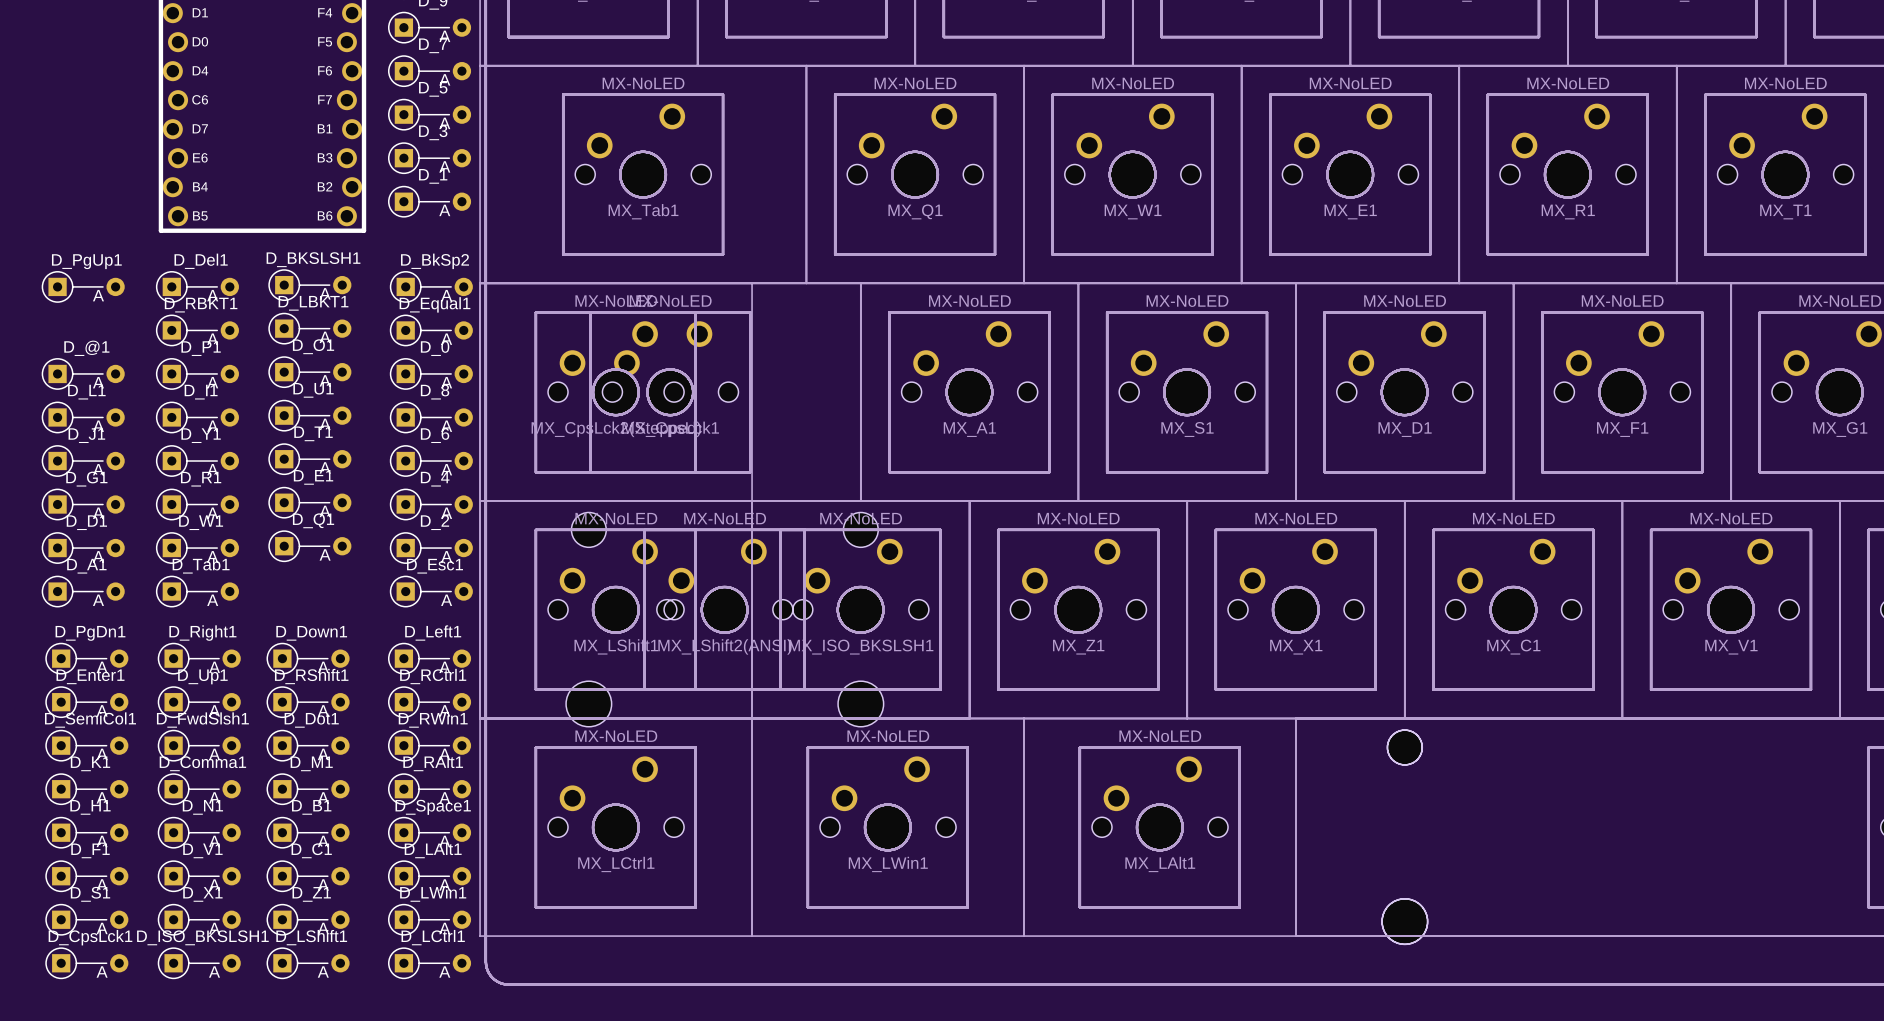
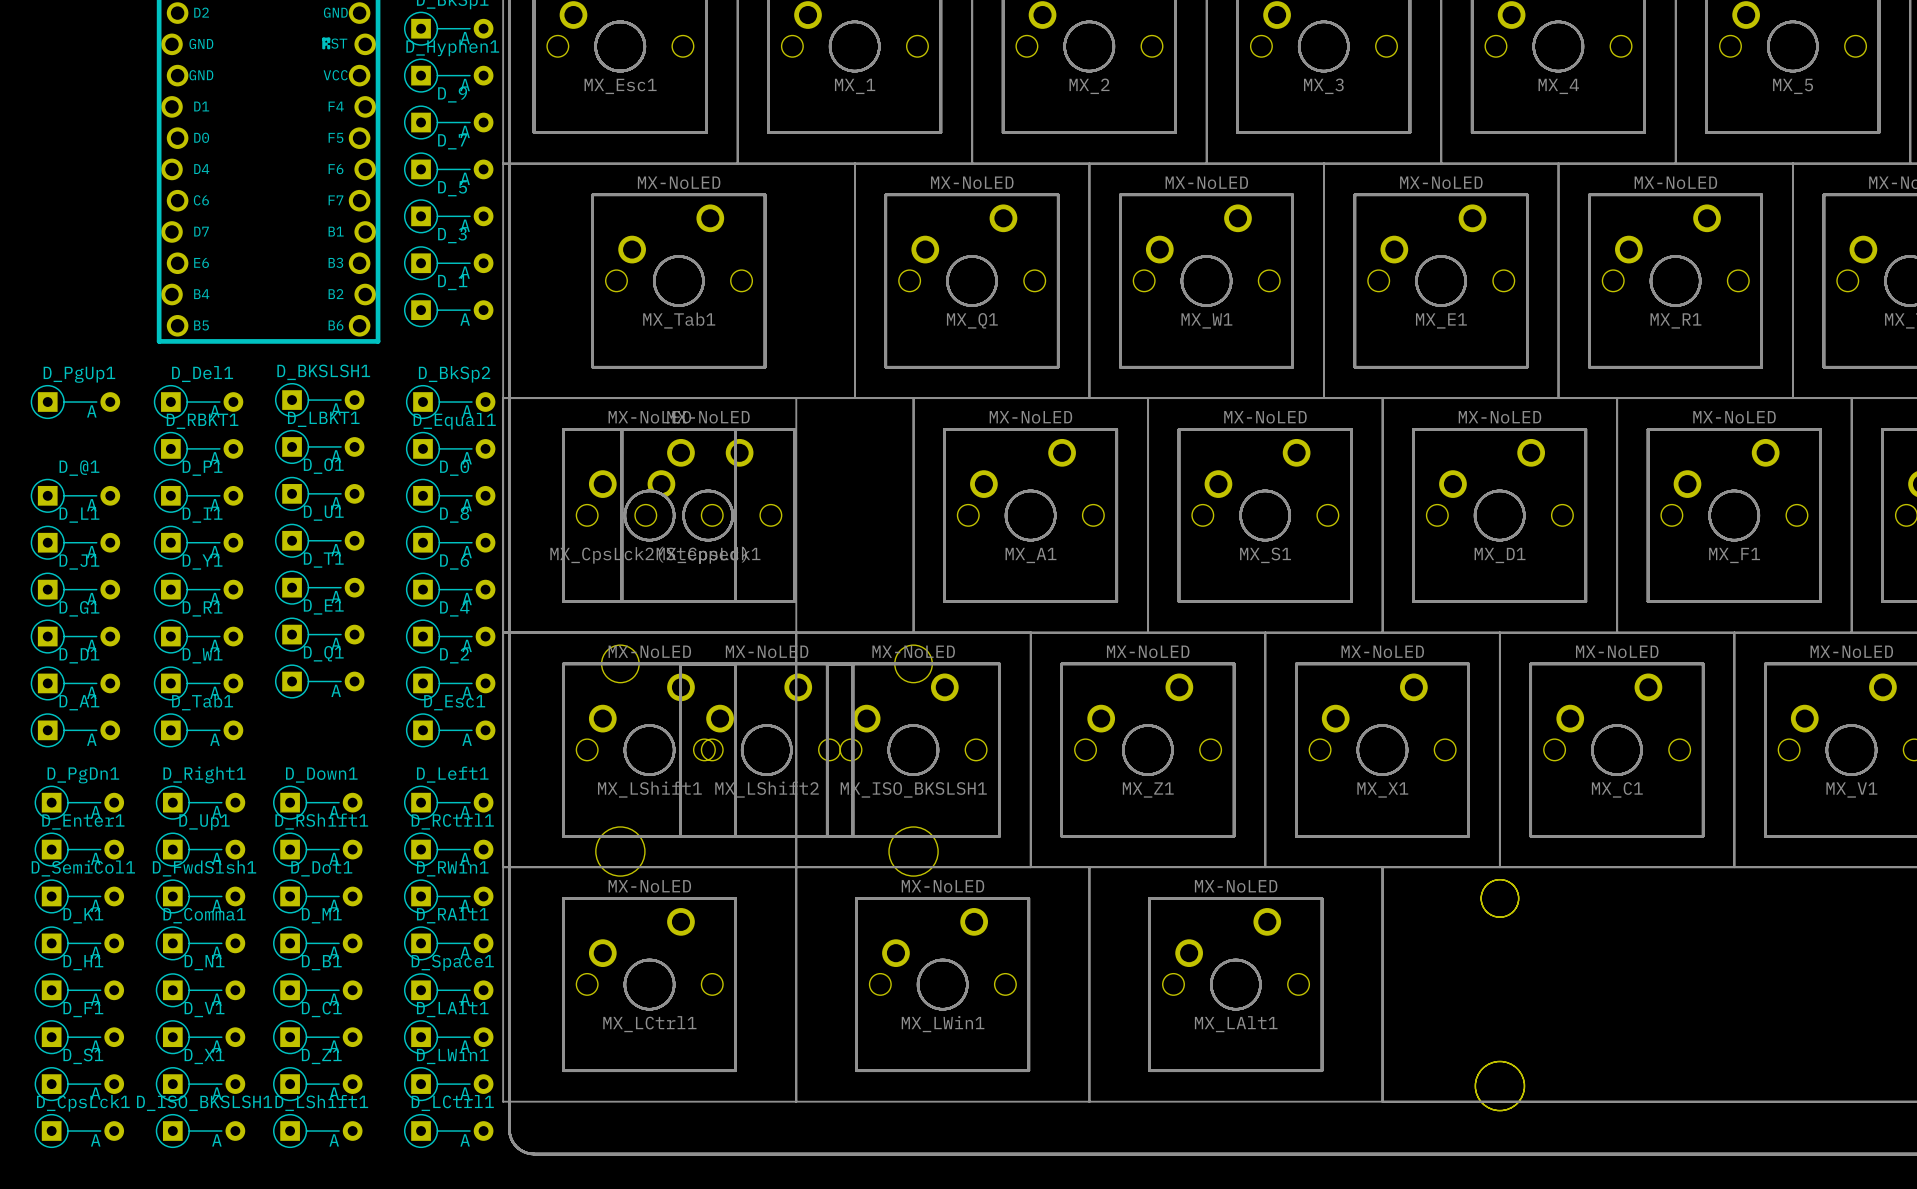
MX_LShift2(ANSI) name: MX_LShift2(ANSI) (725, 646) -> MX_LShift2 (767, 789)

